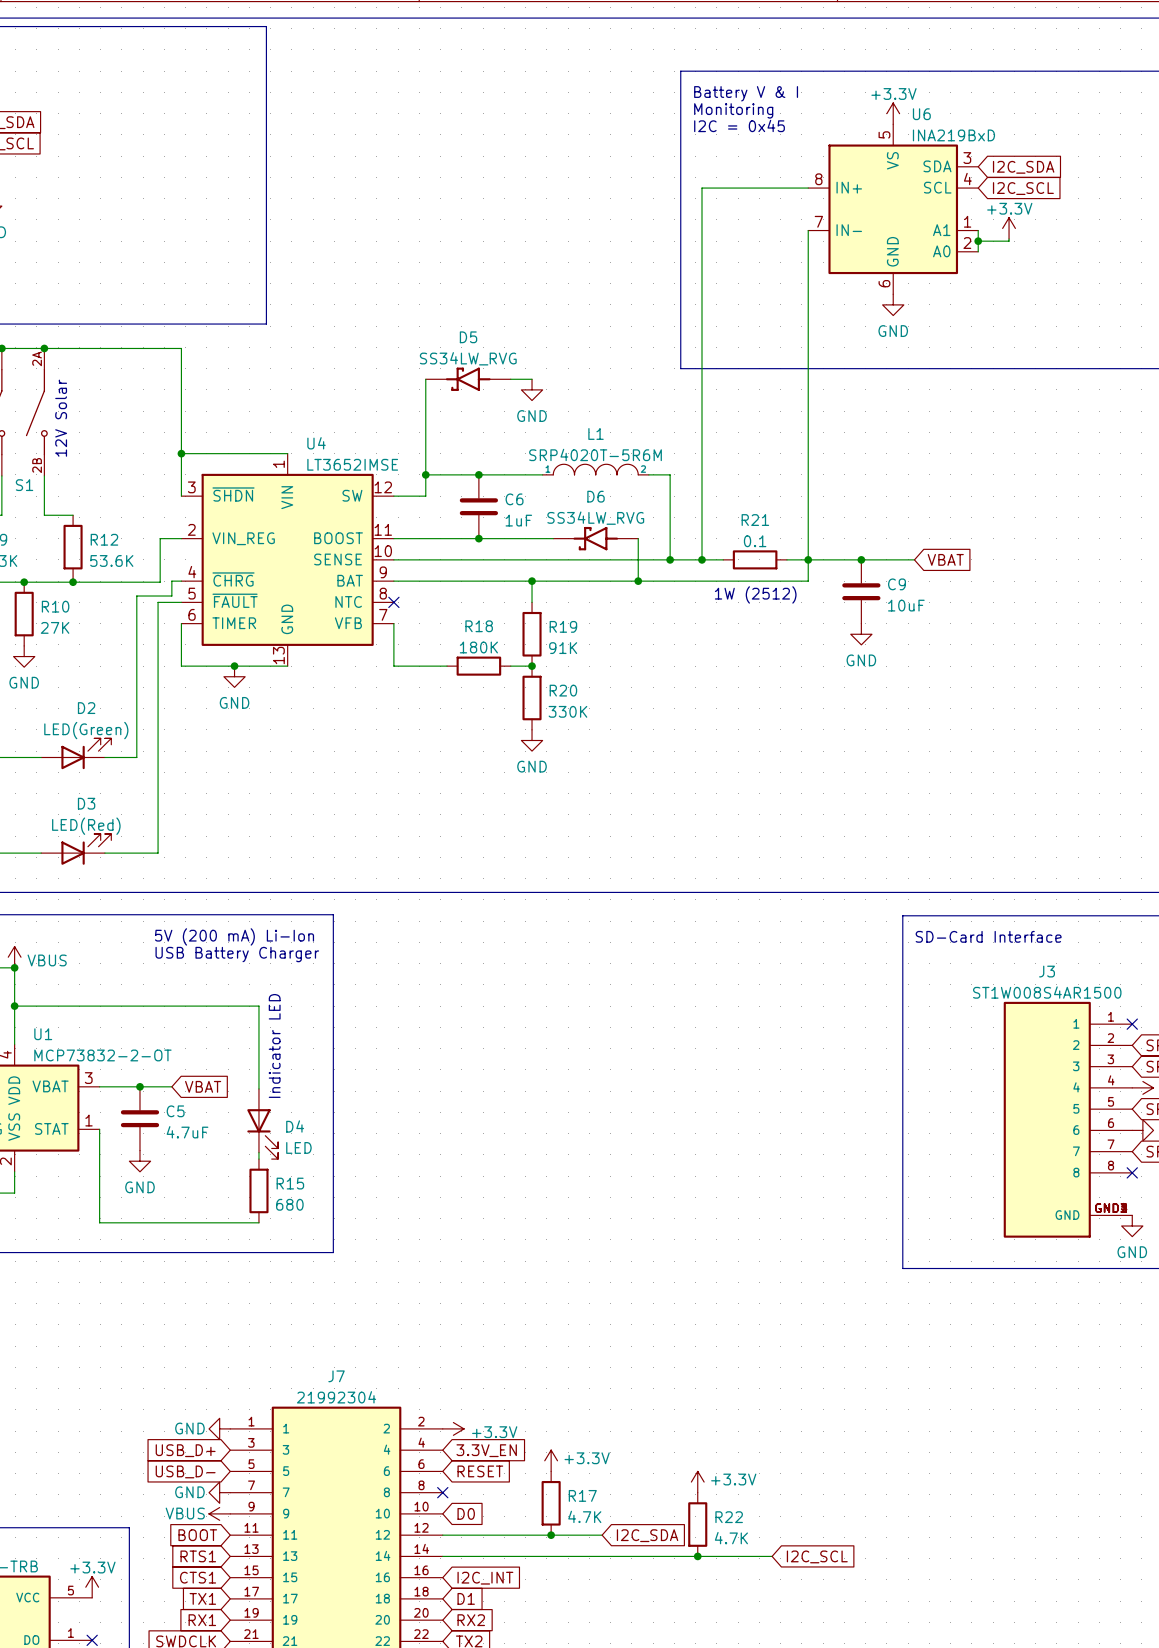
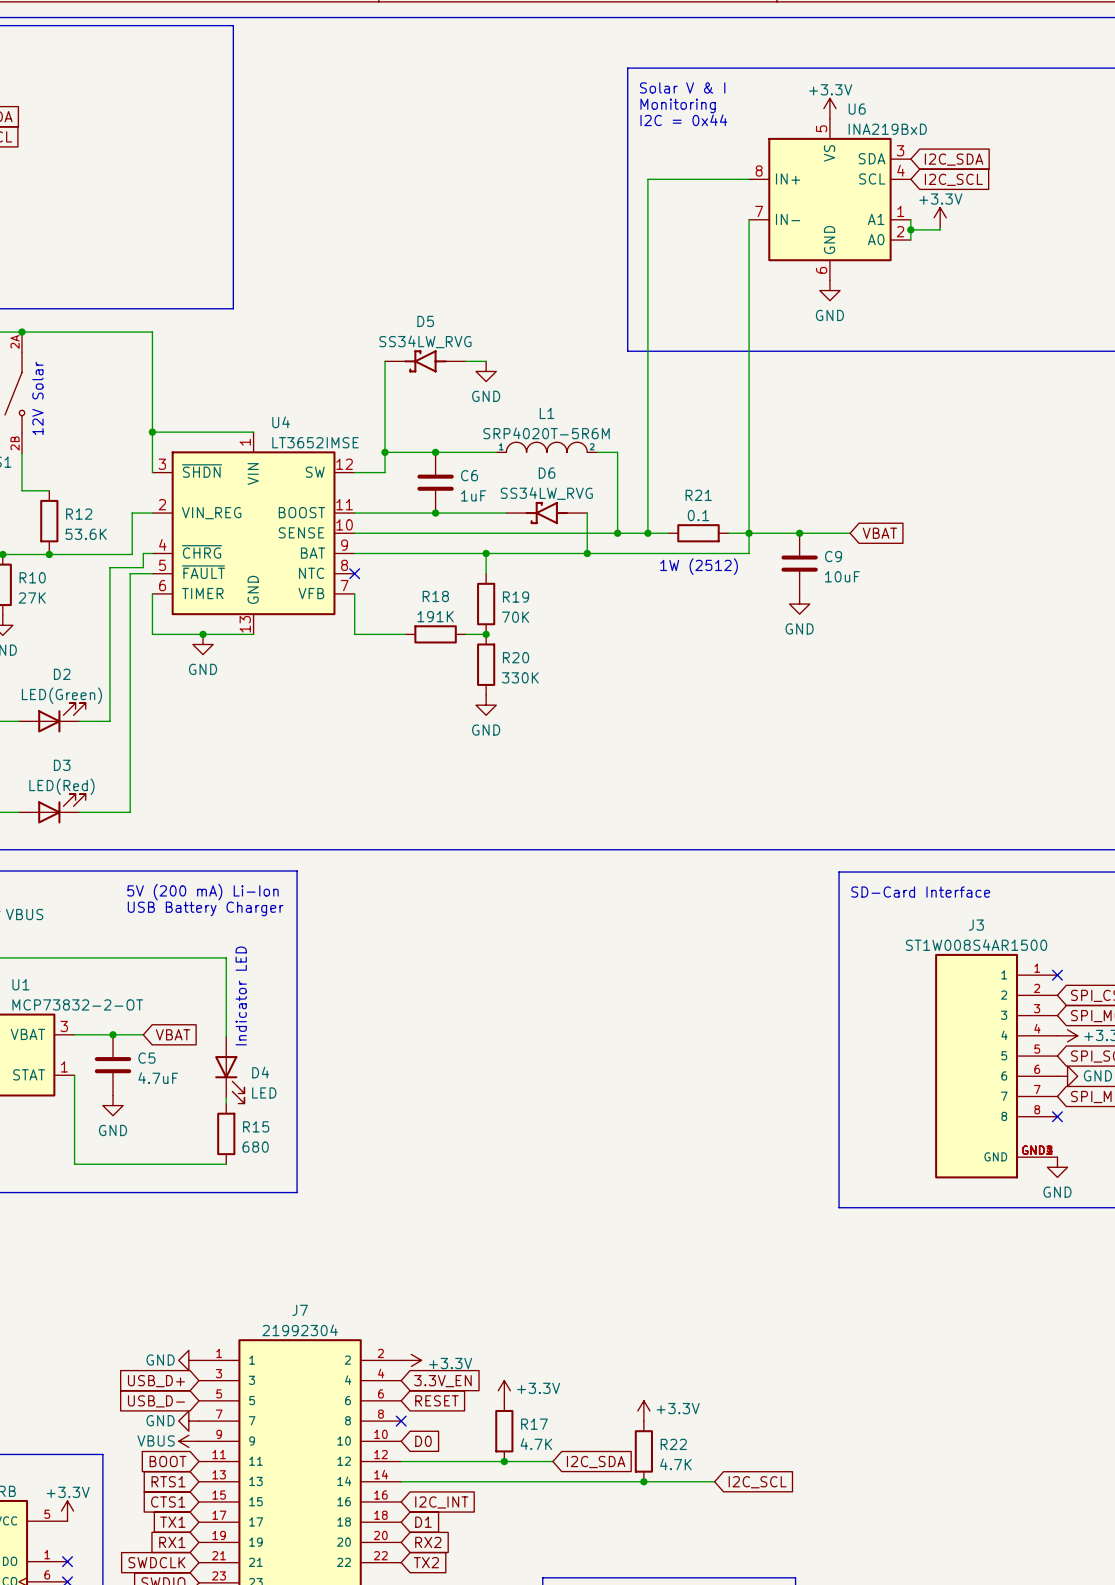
text: Battery V & I (746, 93) -> Solar V & I (682, 87)
text: I2C = 0x45 (739, 125) -> I2C = 0x44 (683, 120)
R18 value: 180K (478, 647) -> 191K (435, 616)
R19 value: 91K (563, 648) -> 70K (515, 617)

